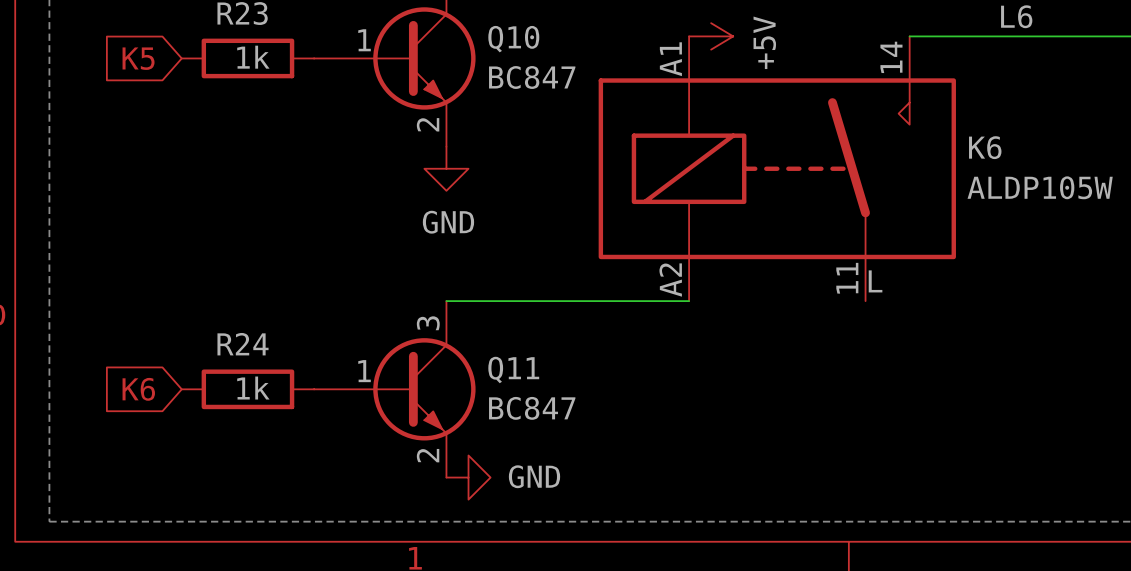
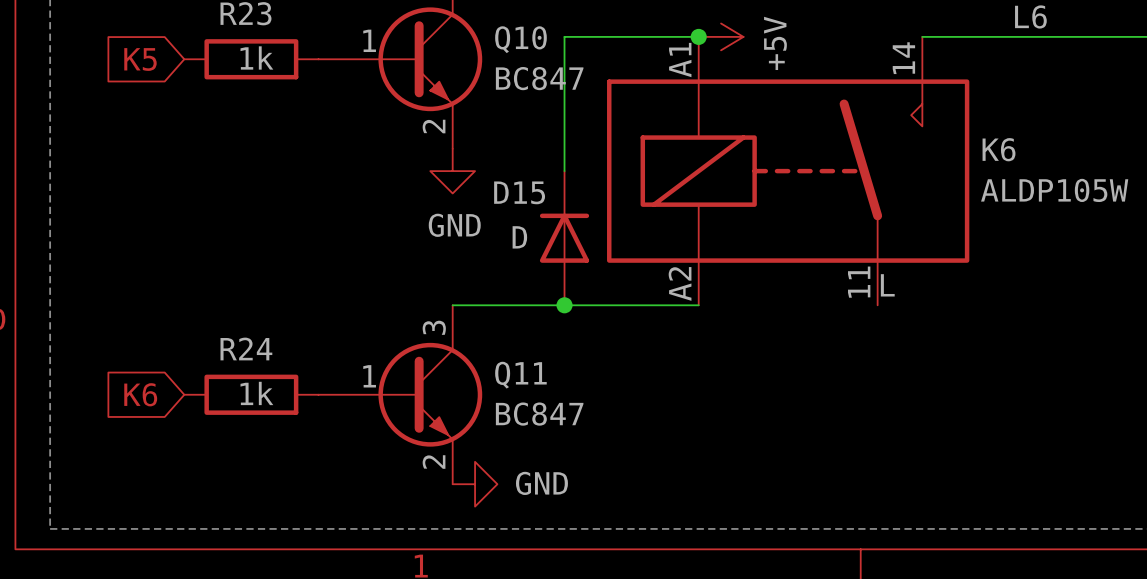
wire: none -> (698, 36) (564, 36) (564, 171)
junction: none -> (698, 36)
D15: none -> D (564, 238)
junction: none -> (564, 305)

